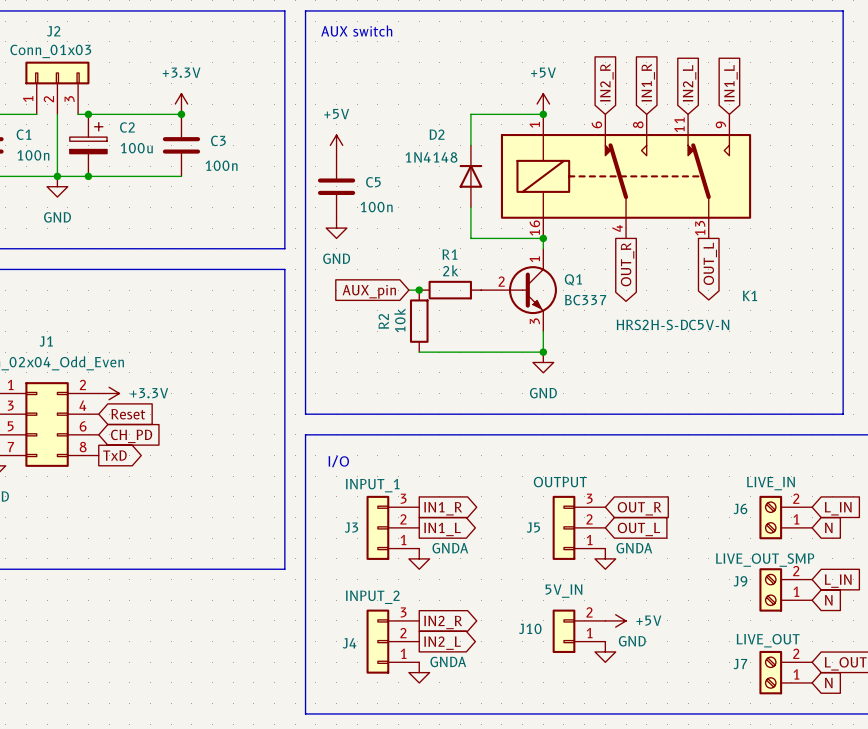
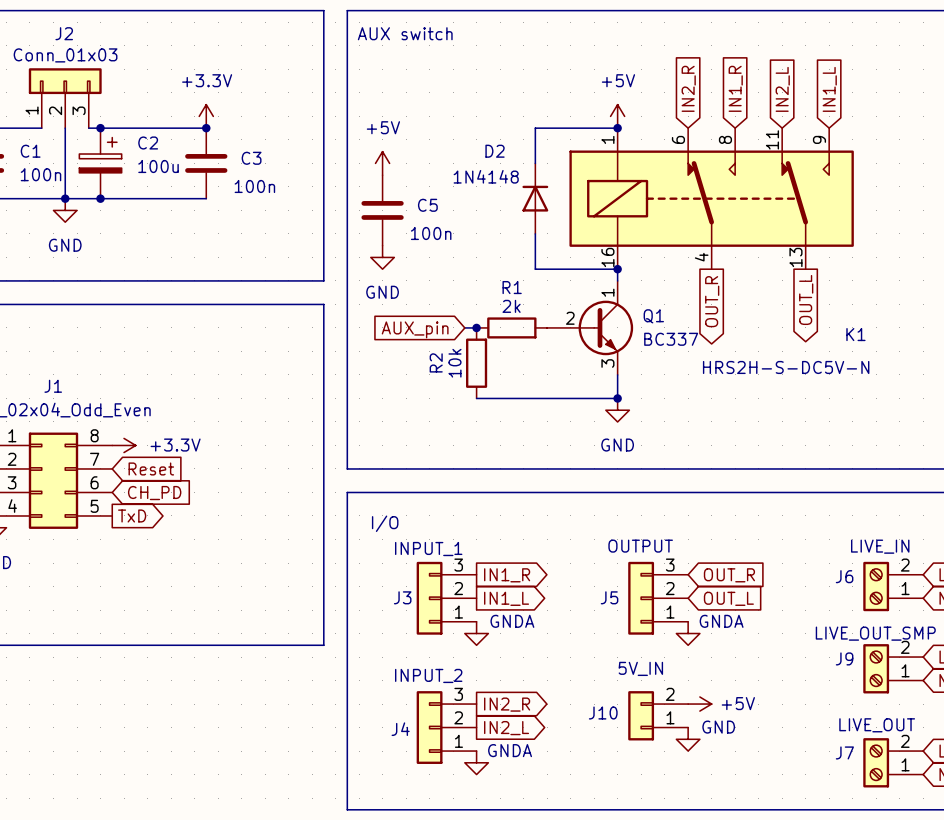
J1 pin number: 2 (82, 384) -> 8 (94, 435)
J1 pin number: 3 (10, 405) -> 2 (12, 459)
J1 pin number: 4 (82, 405) -> 7 (94, 459)
J1 pin number: 5 (10, 426) -> 3 (12, 482)
J1 pin number: 7 (10, 447) -> 4 (12, 506)
J1 pin number: 8 (83, 447) -> 5 (94, 506)

